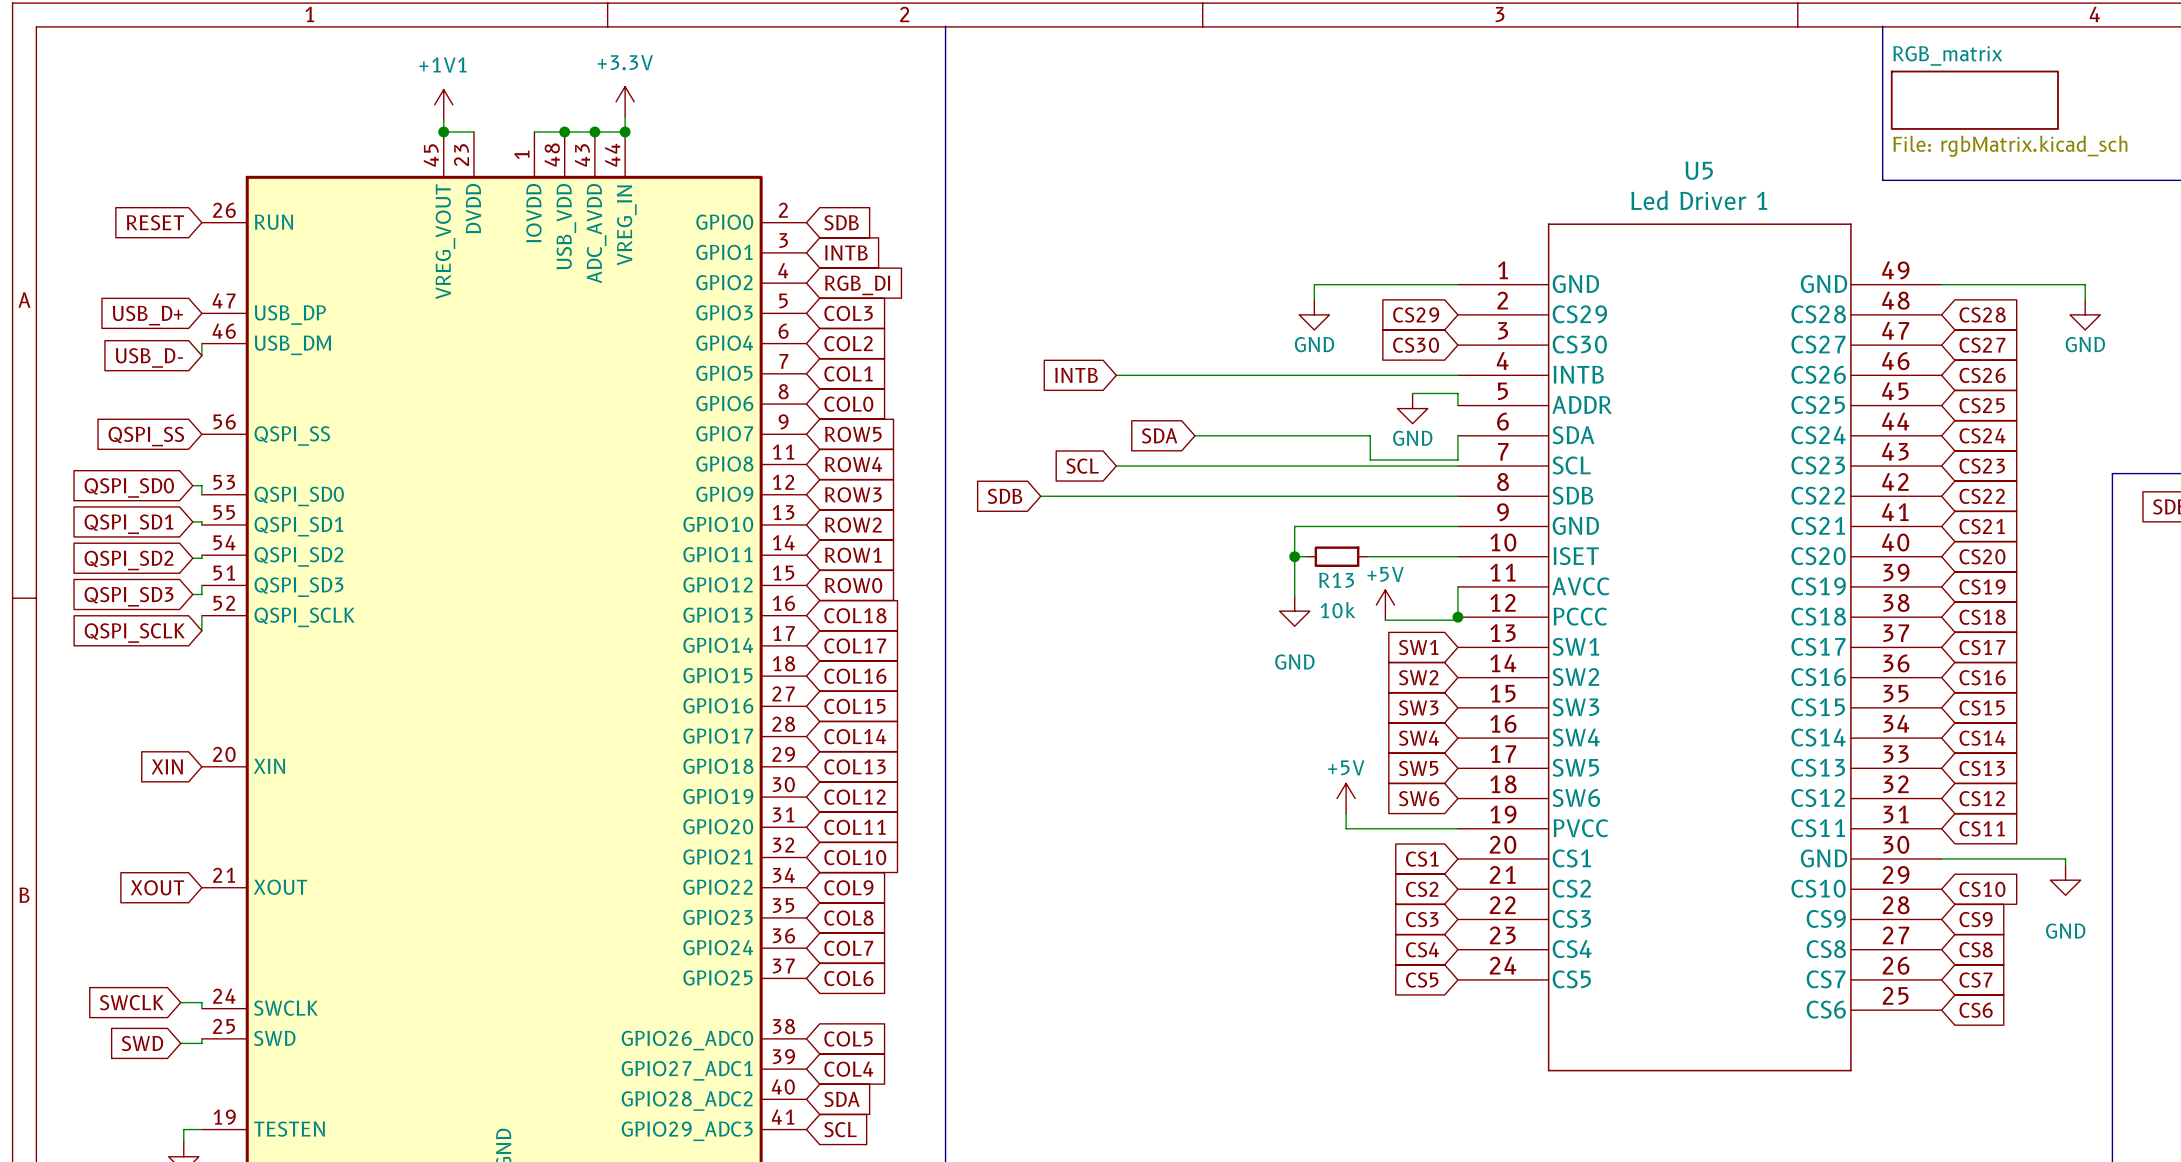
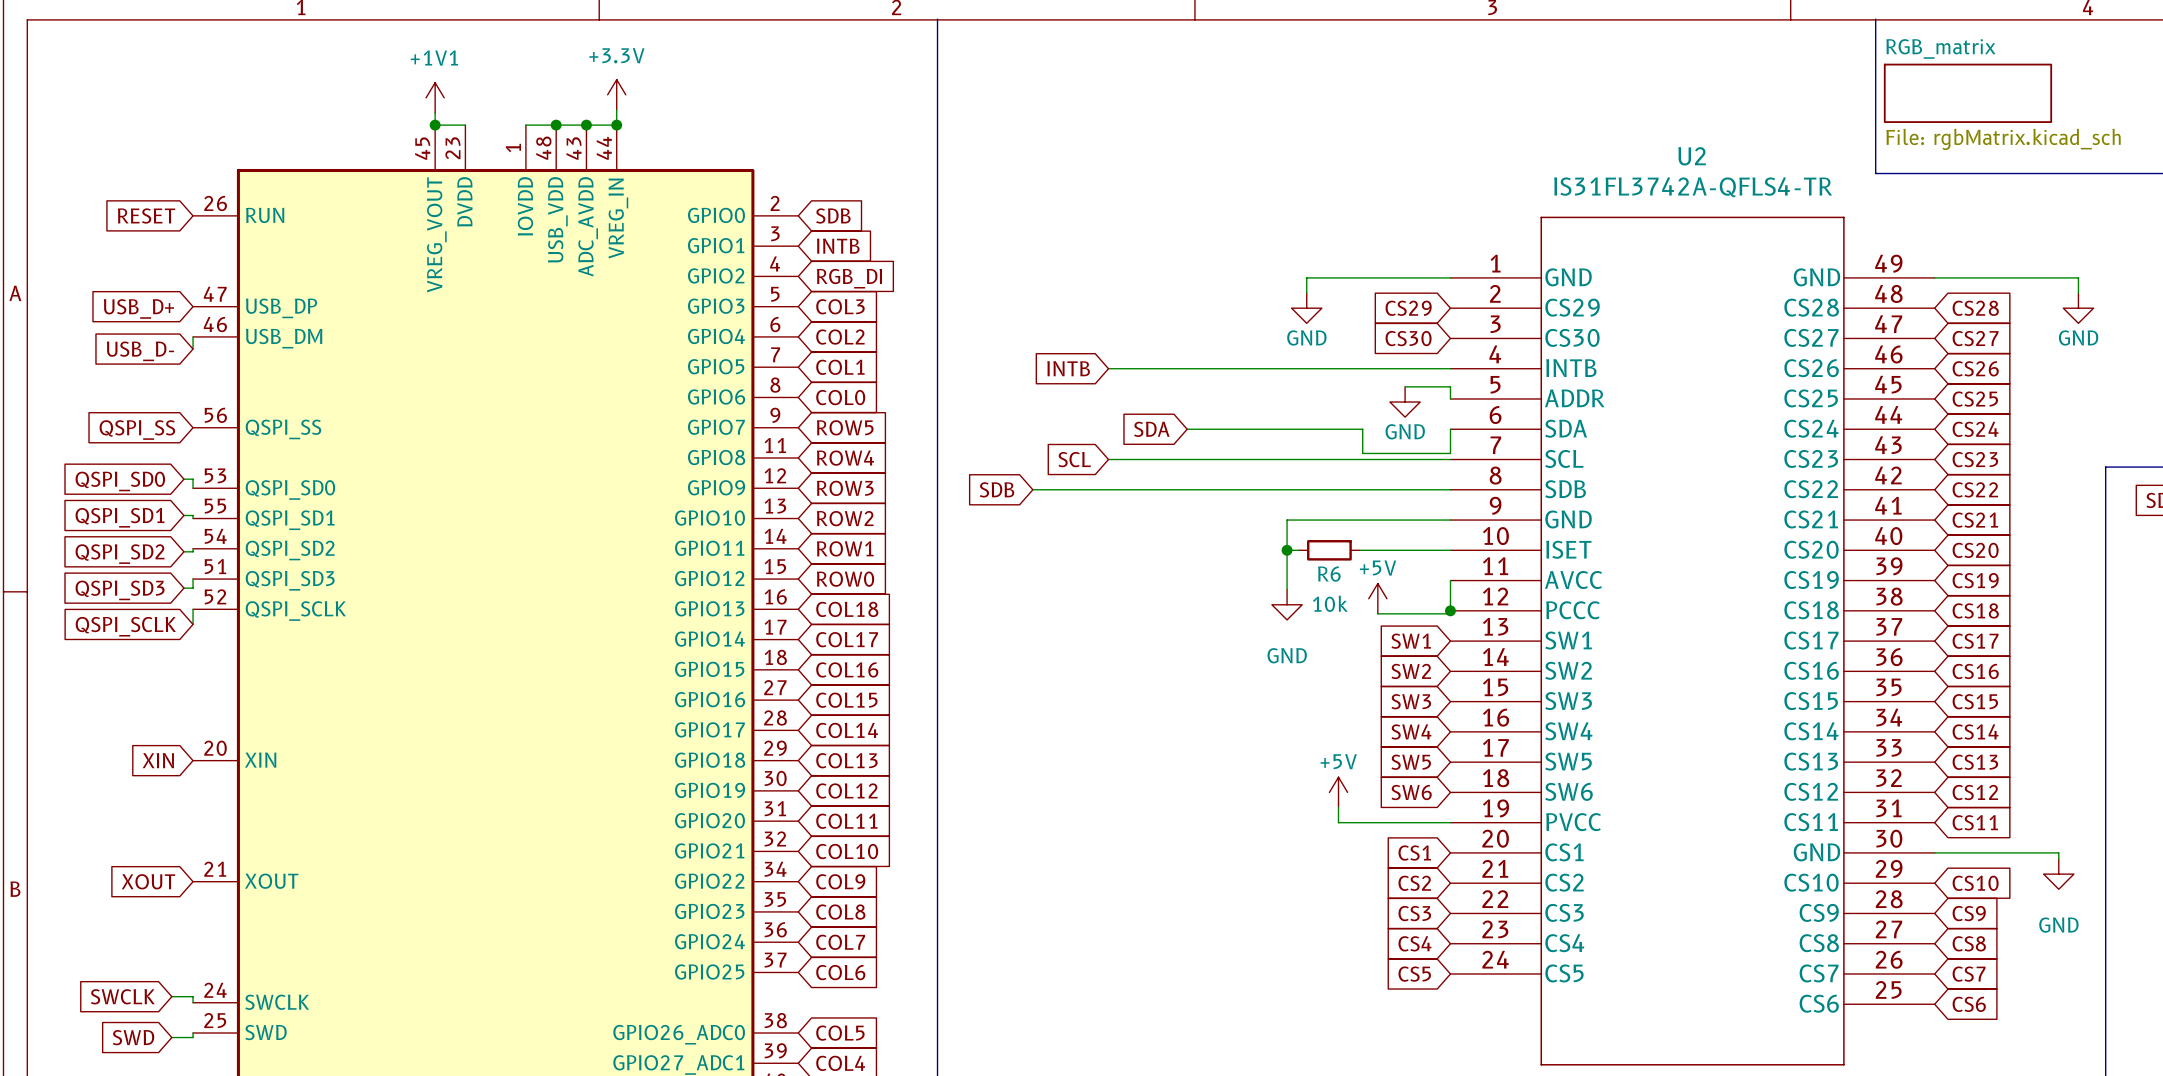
U5 name: U5 (1699, 170) -> U2 (1692, 156)
U5 value: Led Driver 1 (1699, 200) -> IS31FL3742A-QFLS4-TR (1693, 187)
R13 name: R13 (1336, 580) -> R6 (1329, 574)

